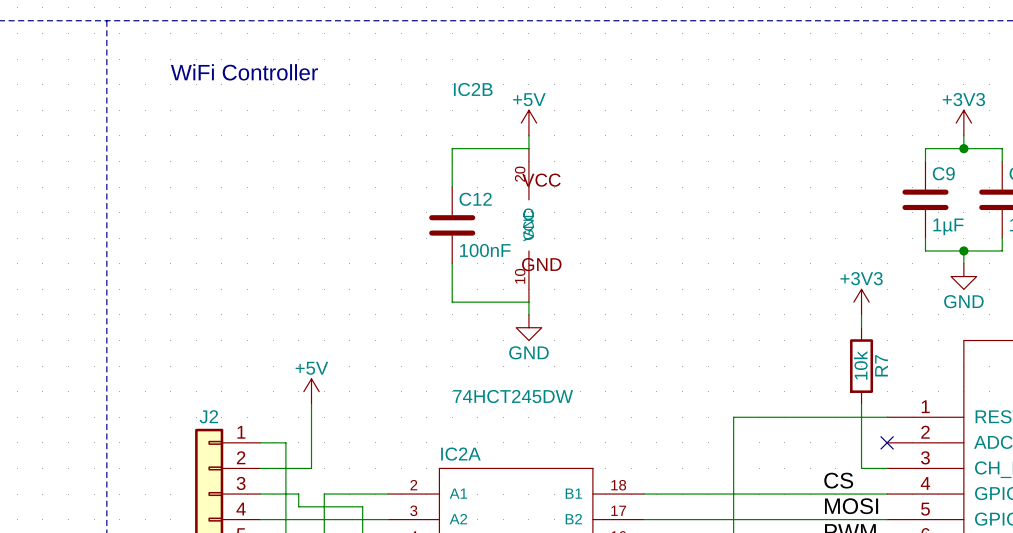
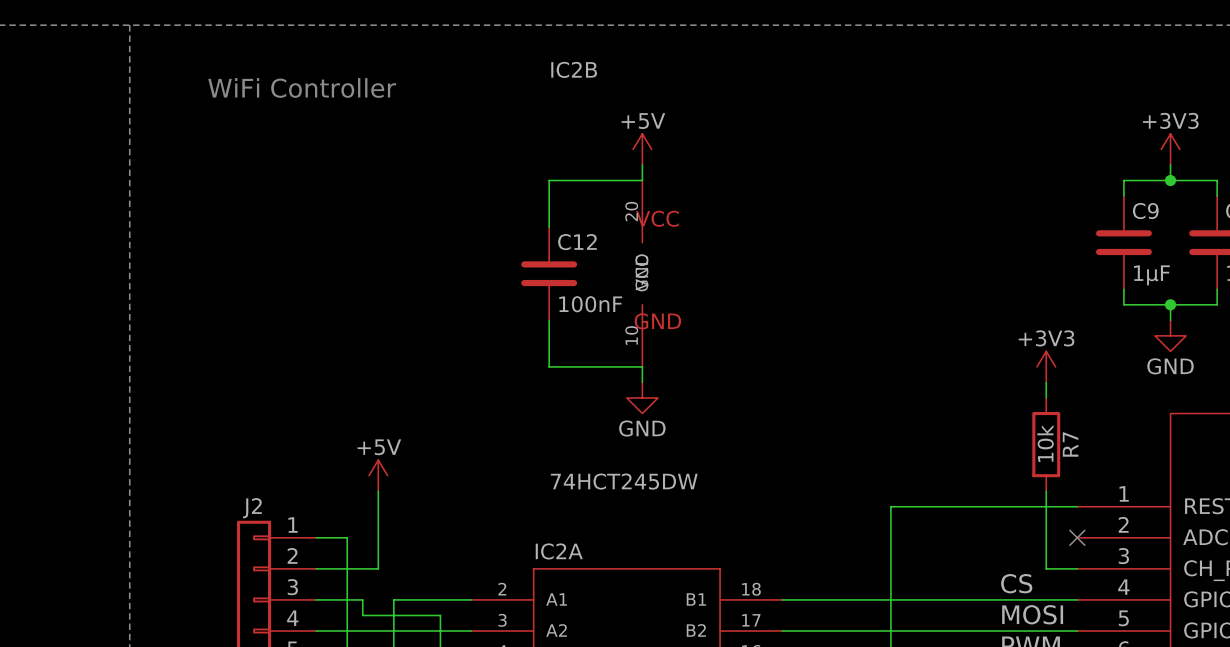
IC2B name position: IC2B (473, 89) -> IC2B (574, 69)

